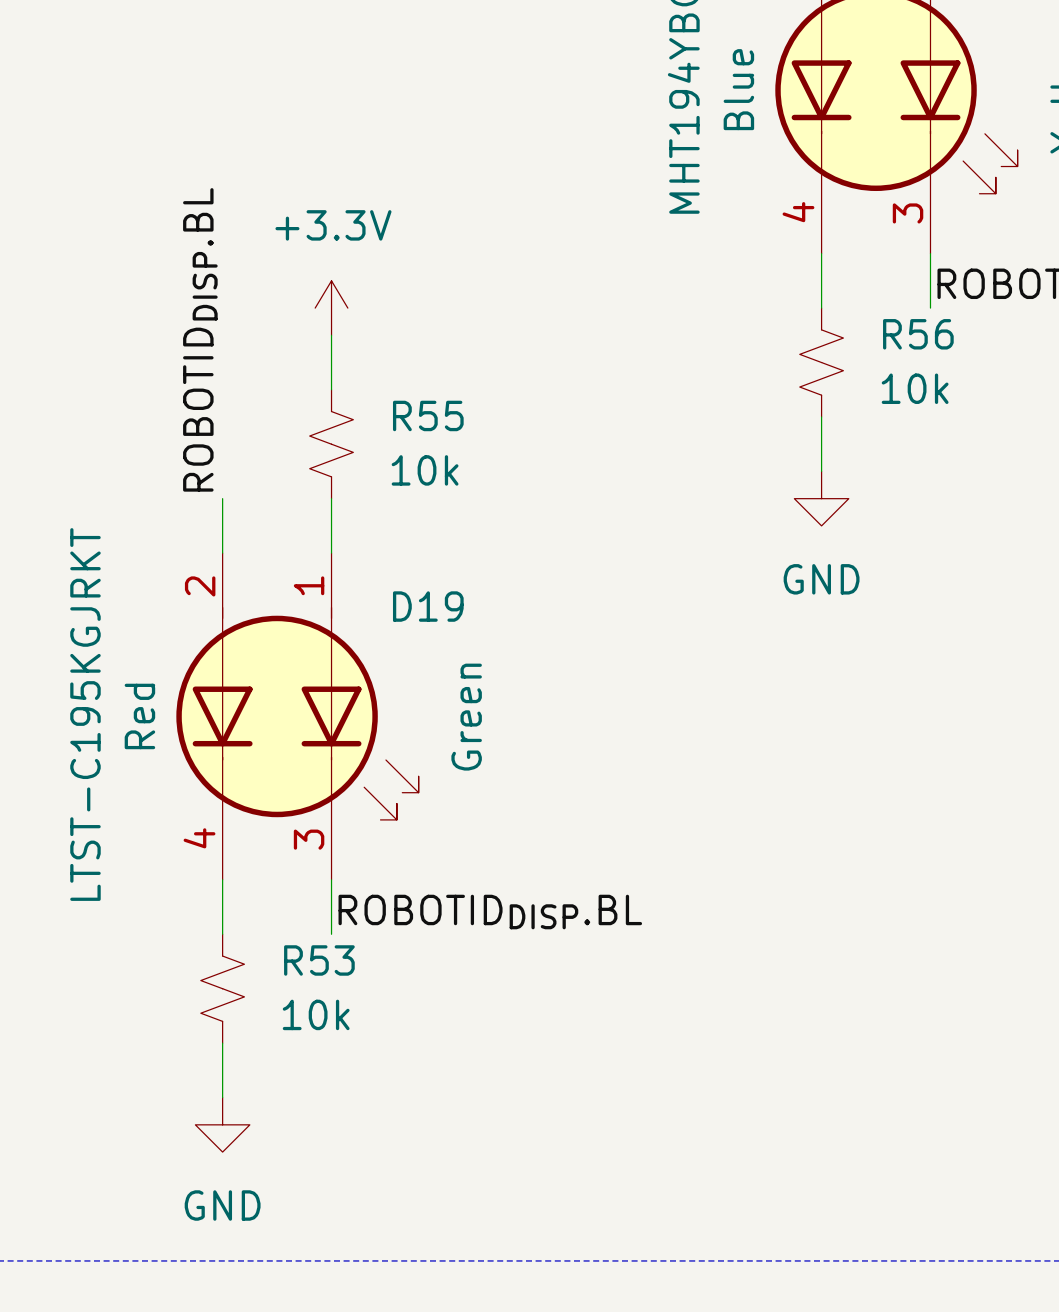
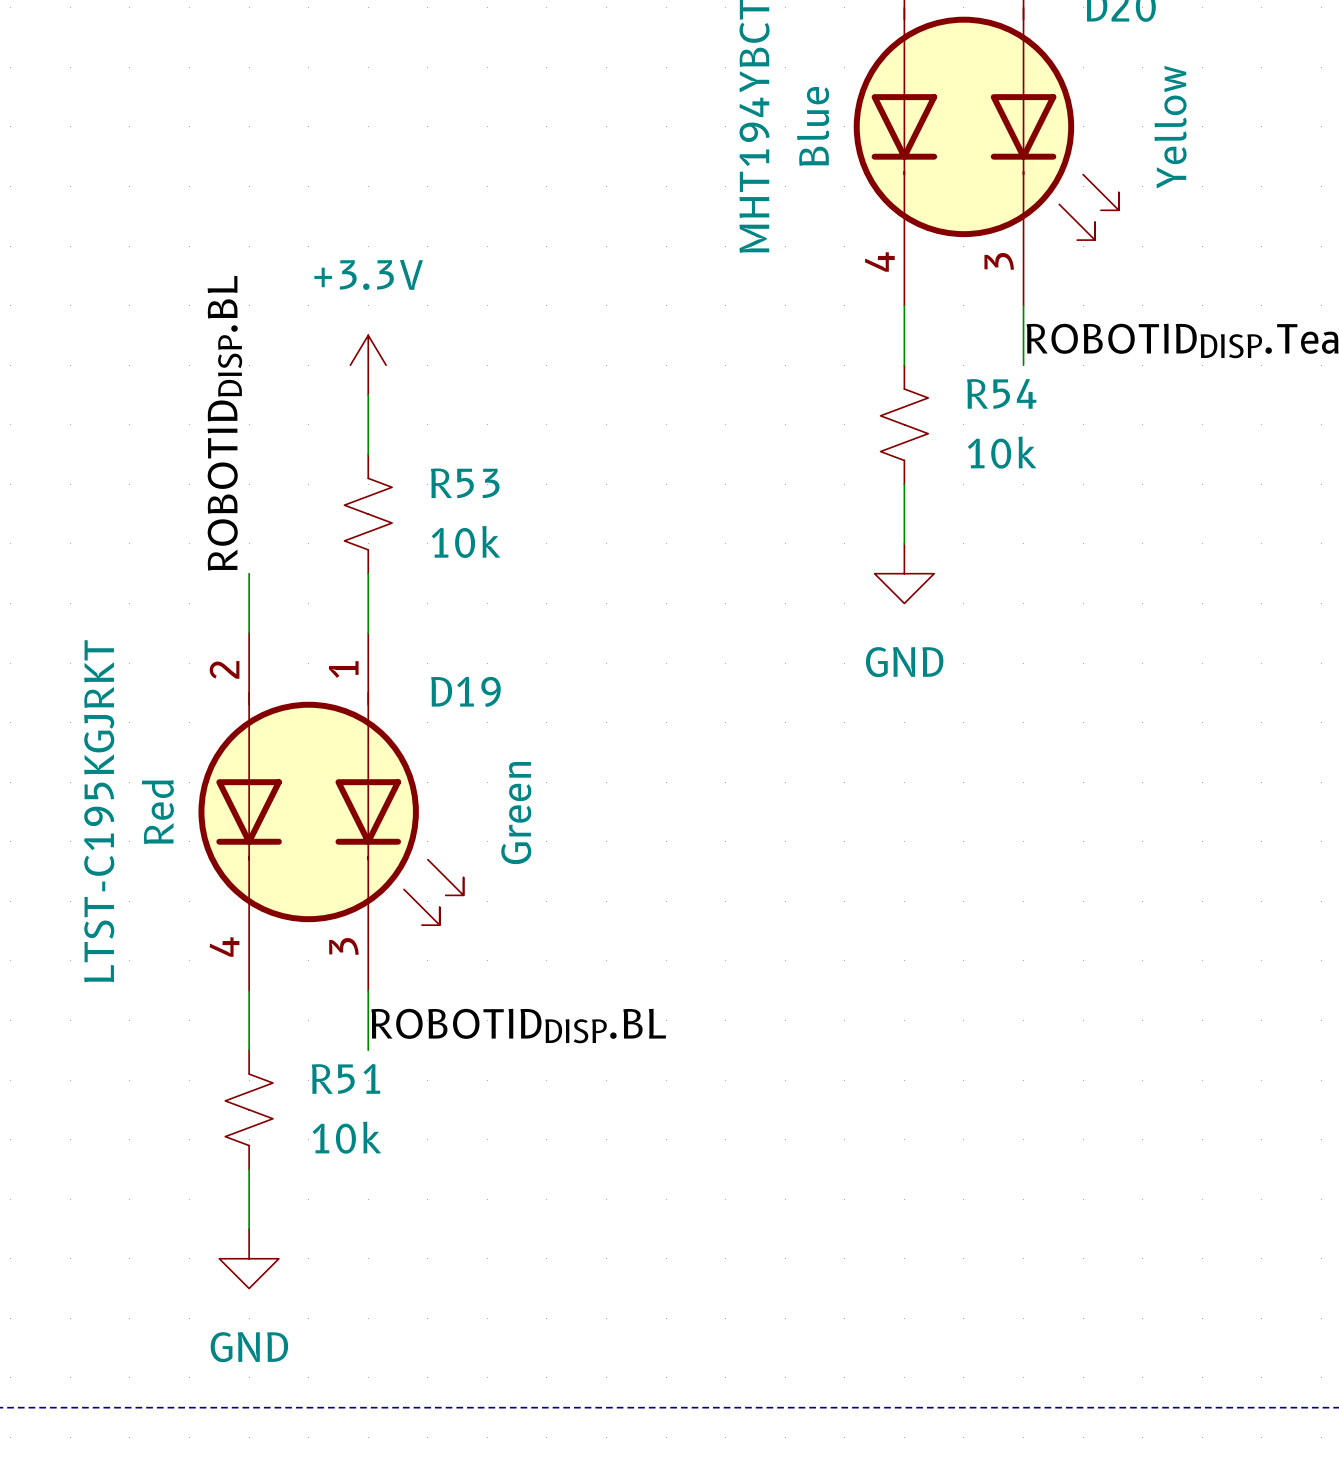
R56 name: R56 (918, 334) -> R54 (1001, 393)
R55 name: R55 (428, 415) -> R53 (465, 483)
R53 name: R53 (319, 960) -> R51 (345, 1078)

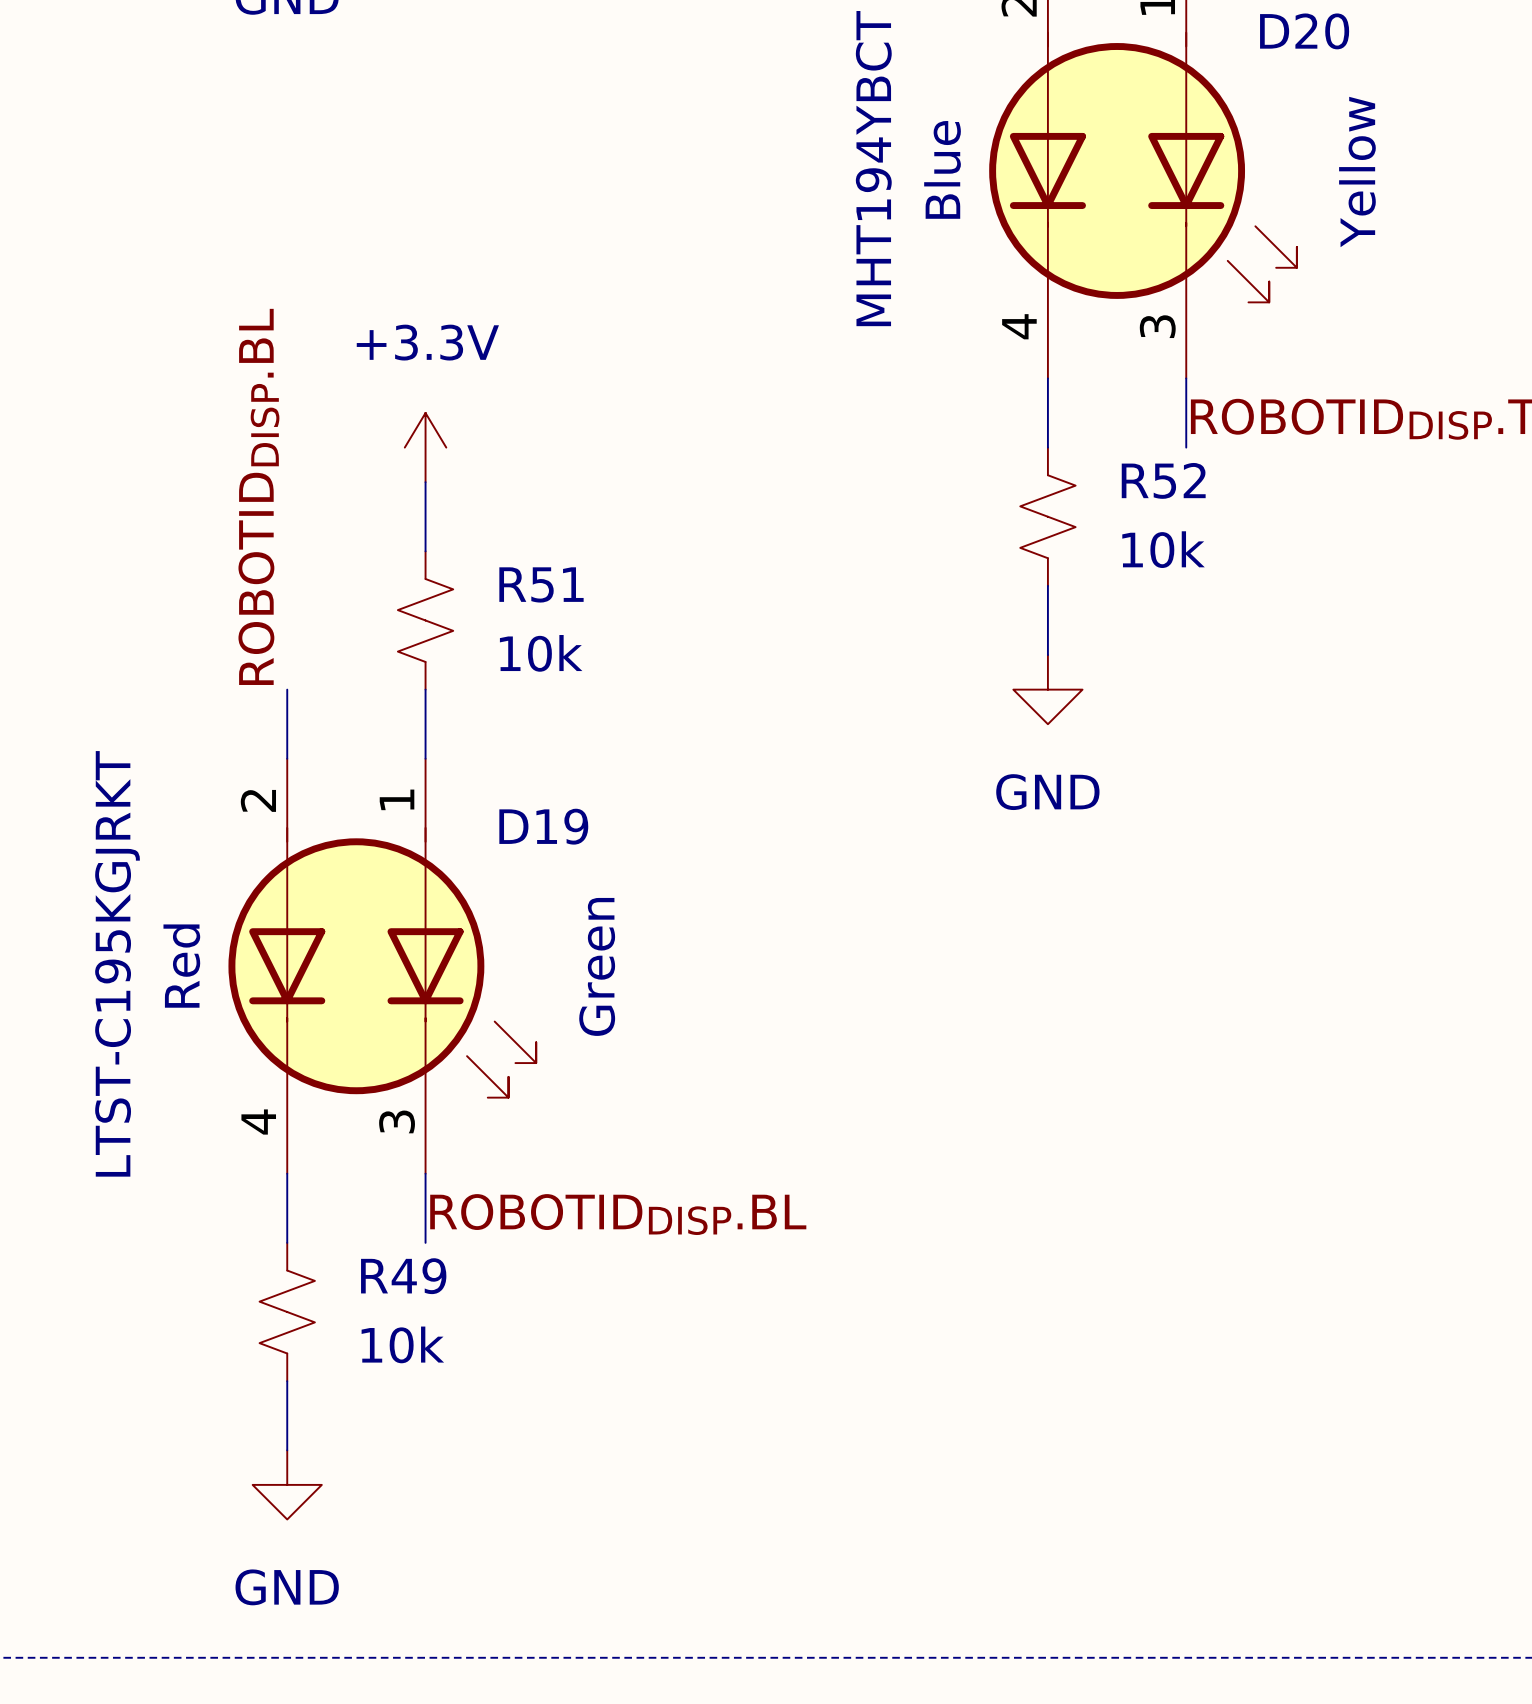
R54 name: R54 (1001, 393) -> R52 (1163, 480)
R53 name: R53 (465, 483) -> R51 (541, 584)
R51 name: R51 (345, 1078) -> R49 (403, 1276)

